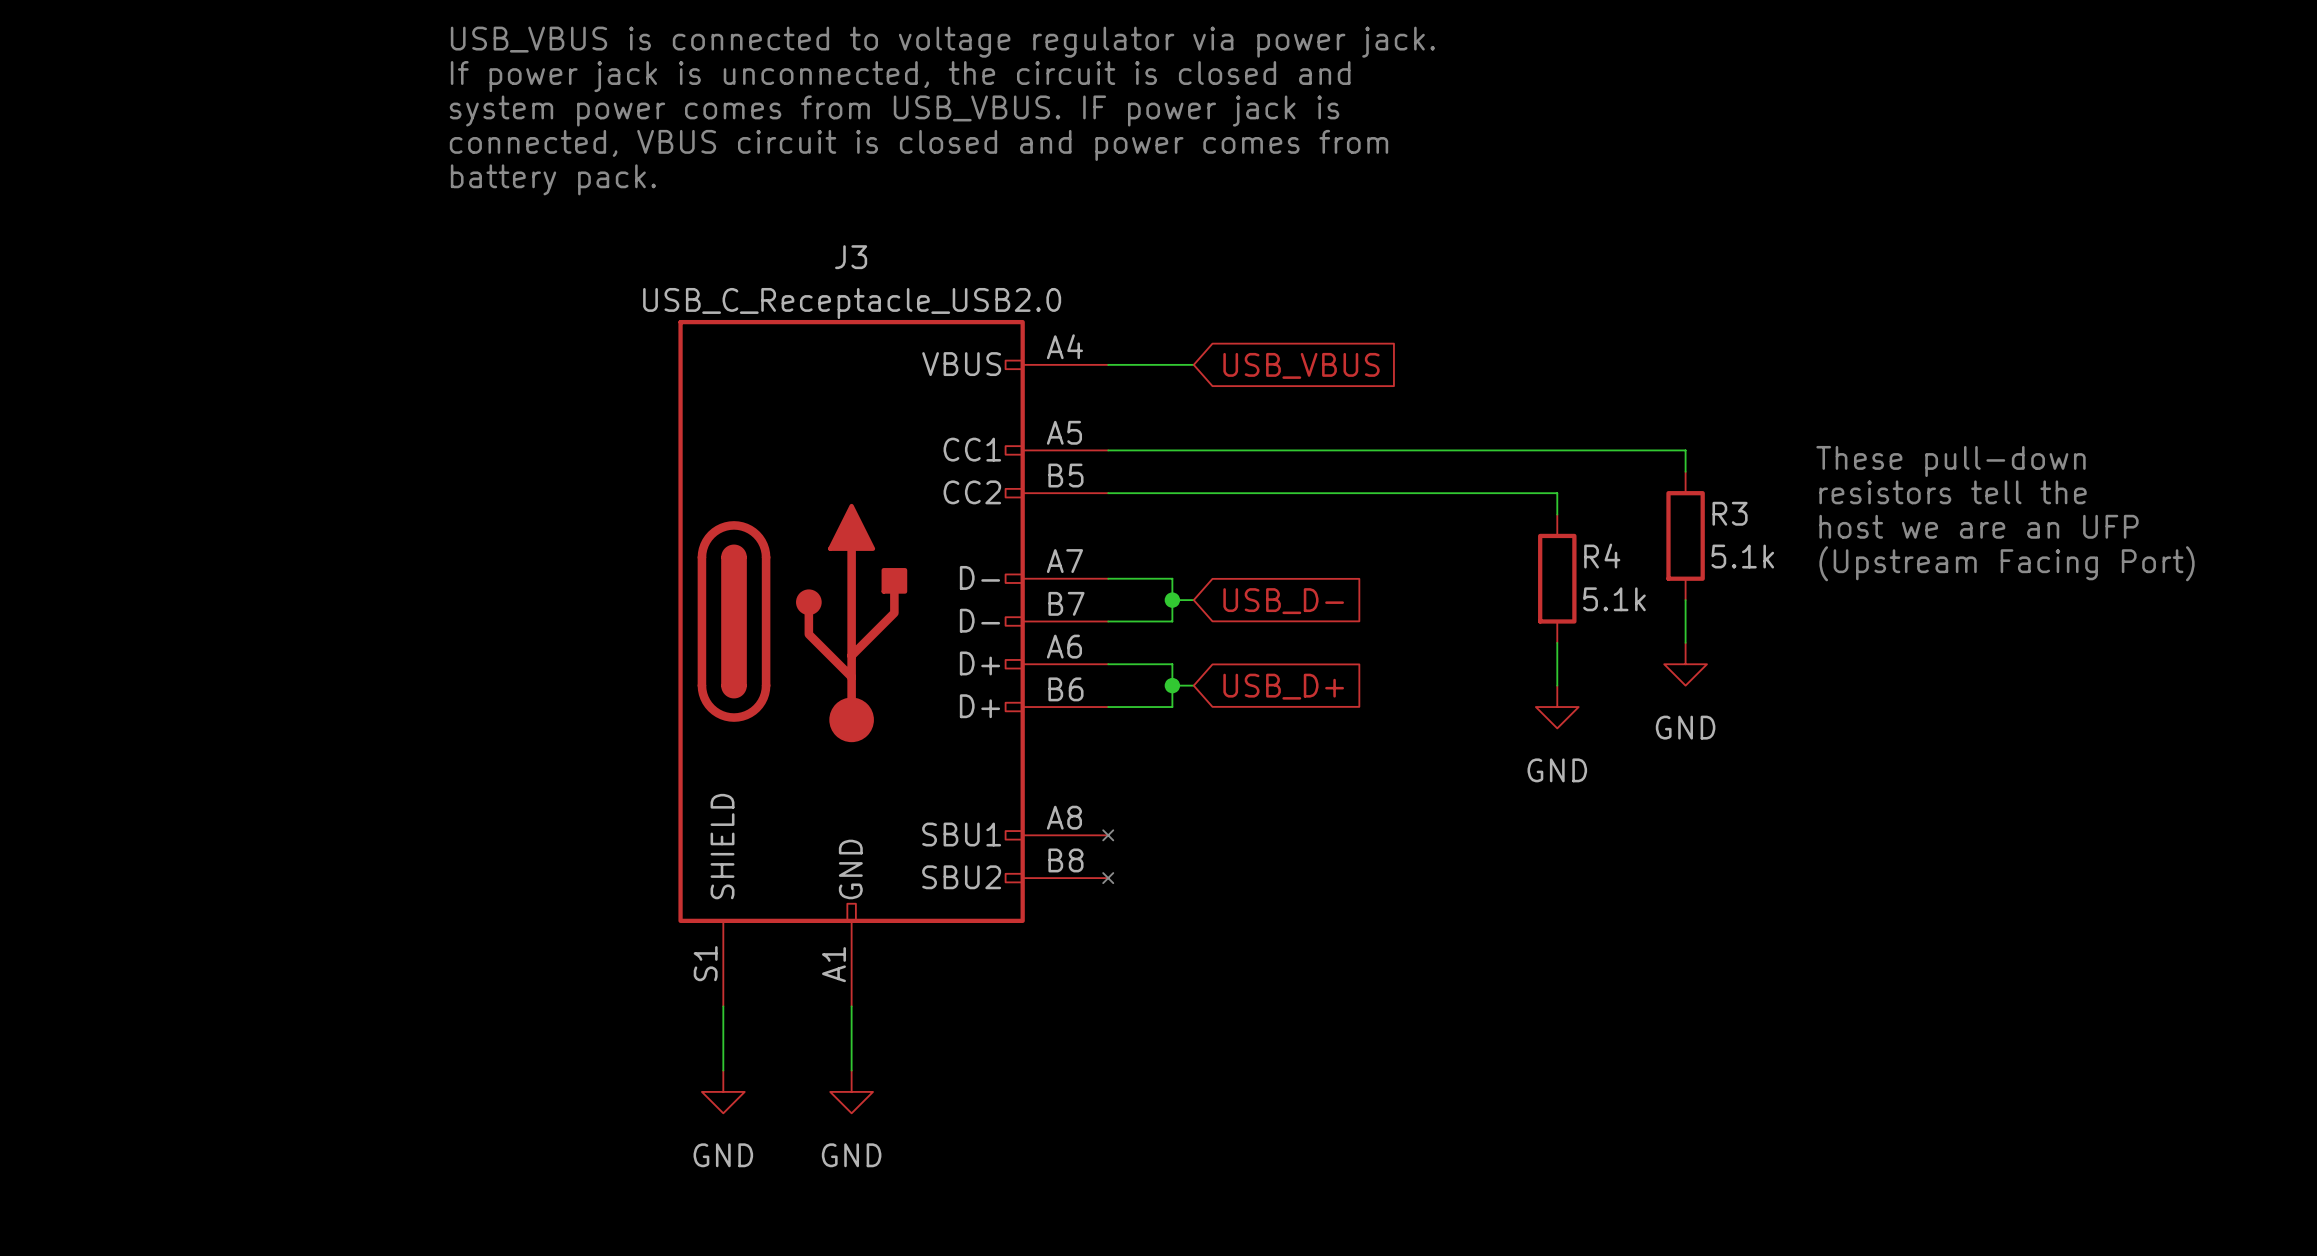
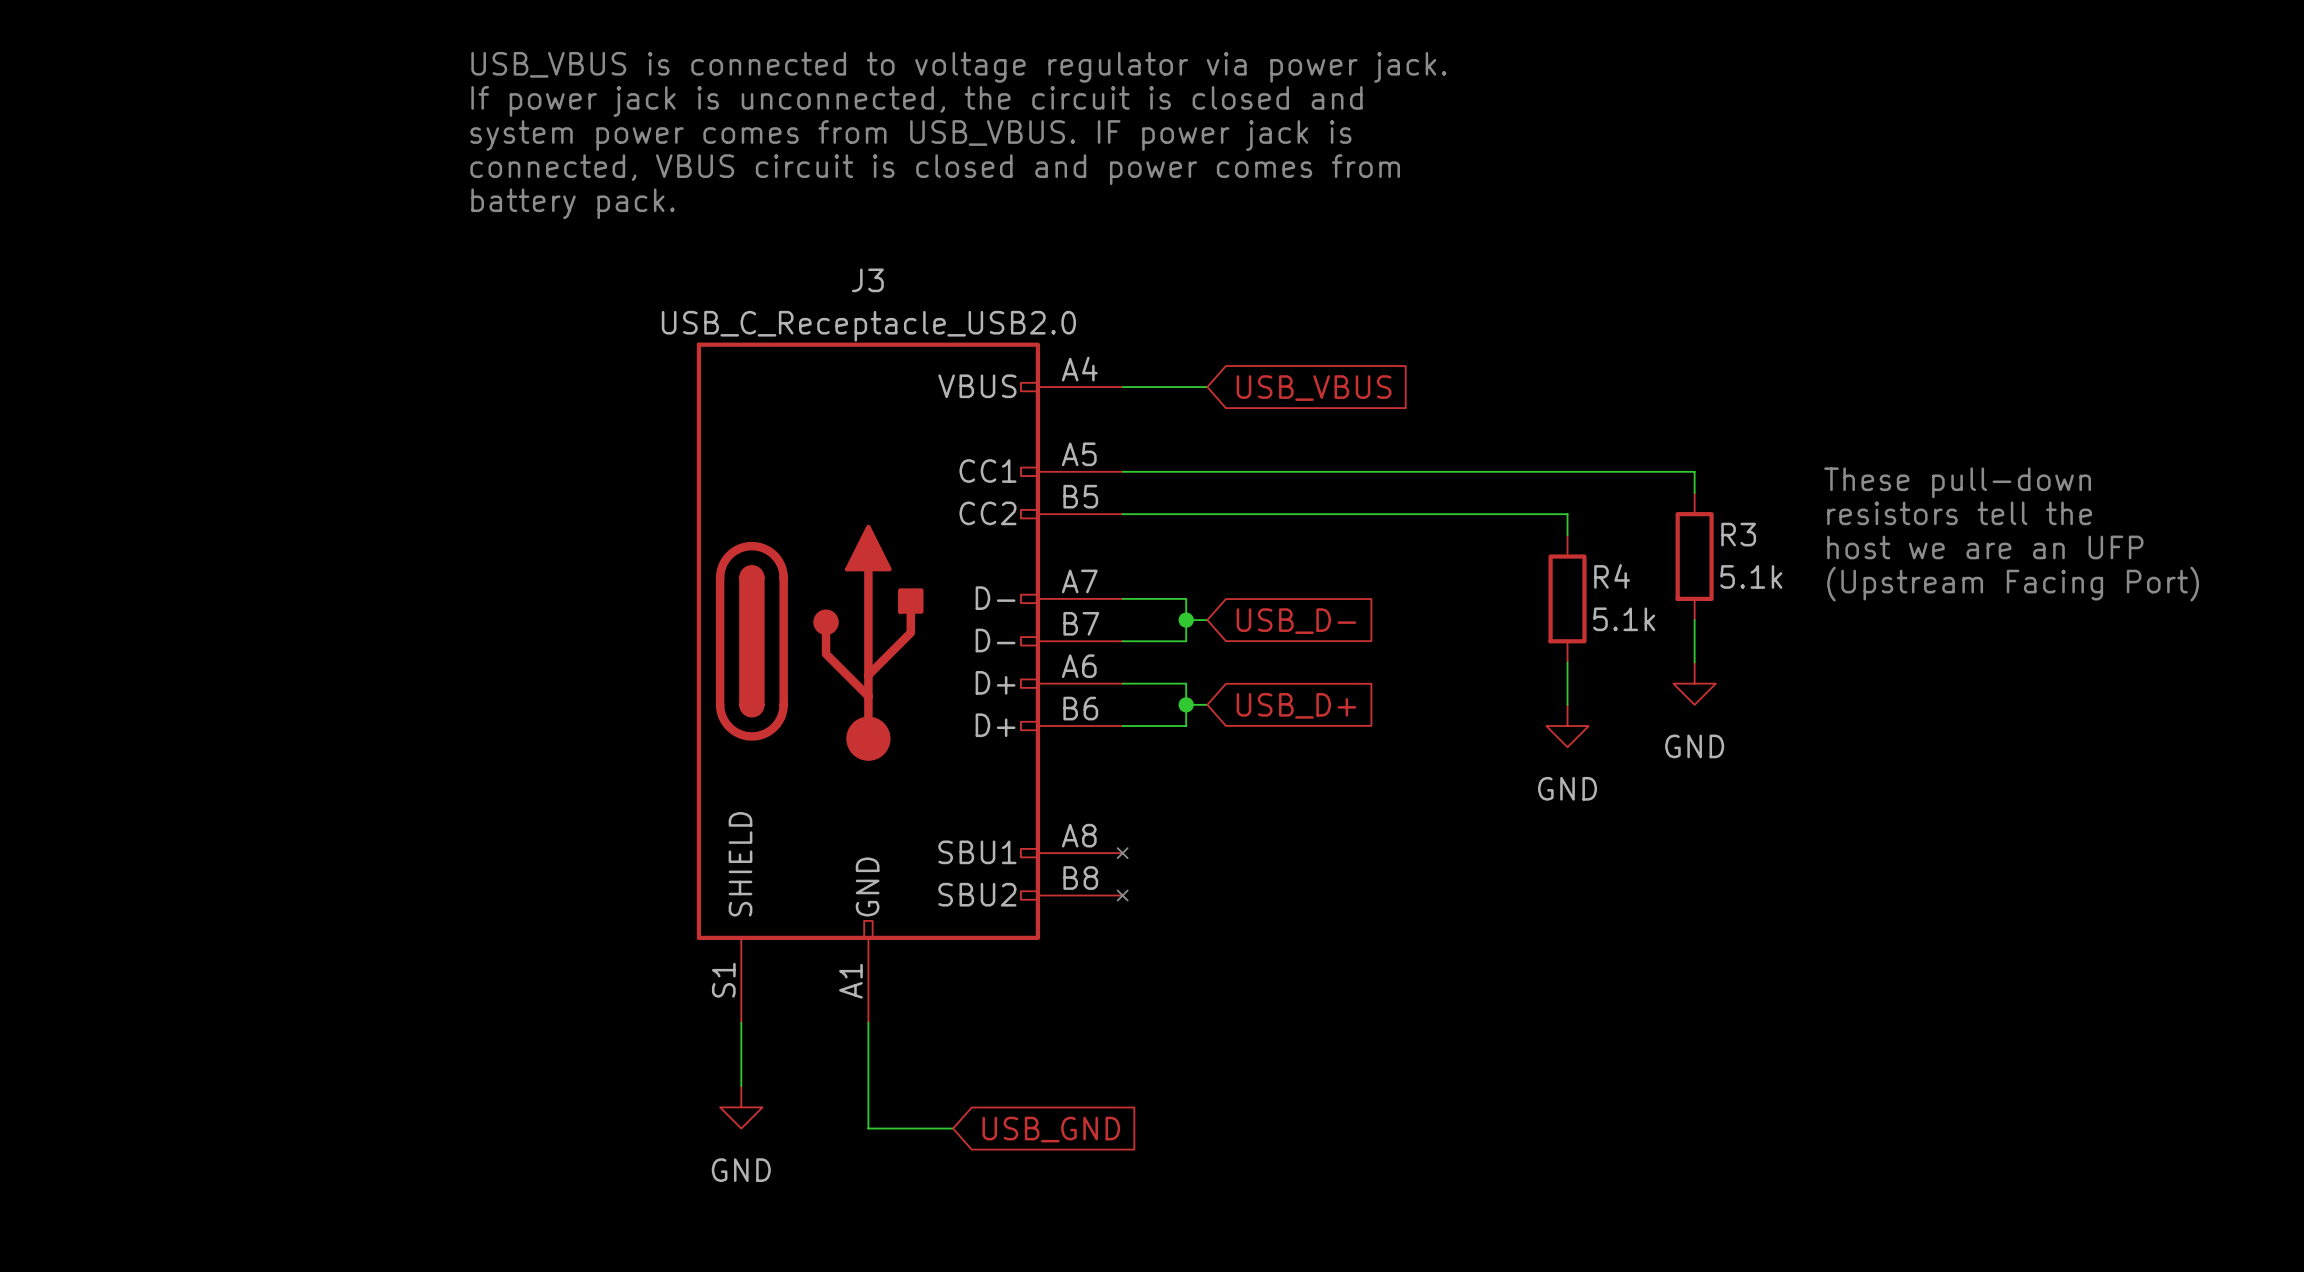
wire: none -> (868, 1086) (868, 1128) (953, 1128)
power symbol: GND (851, 1091) -> none
global label: none -> USB_GND (1051, 1129)

